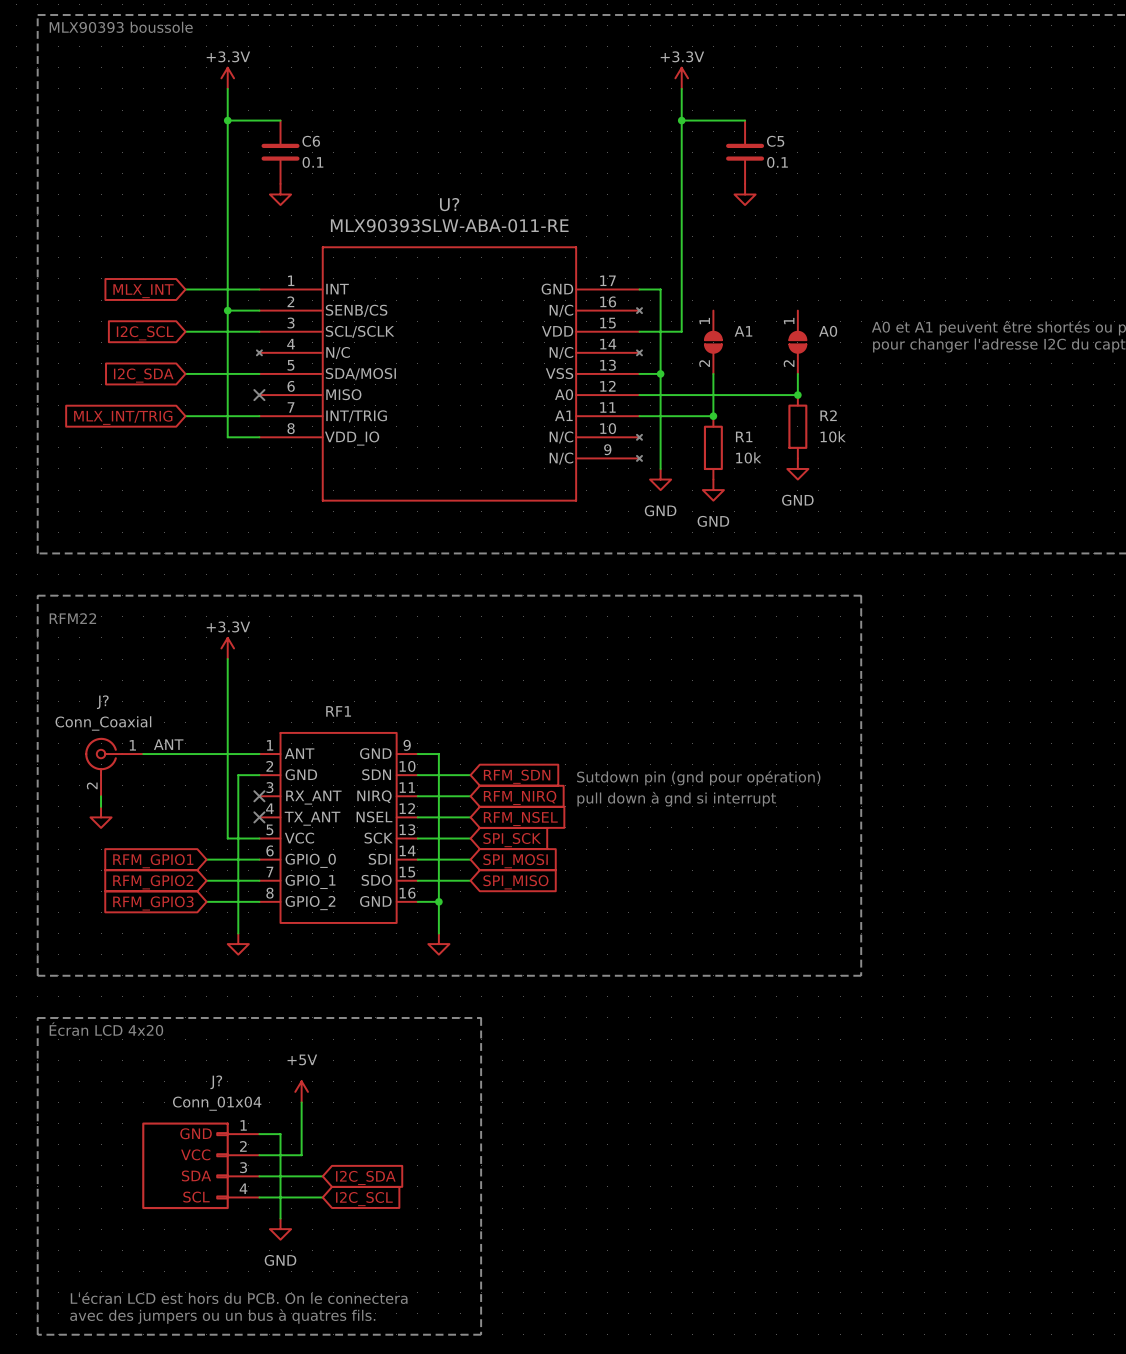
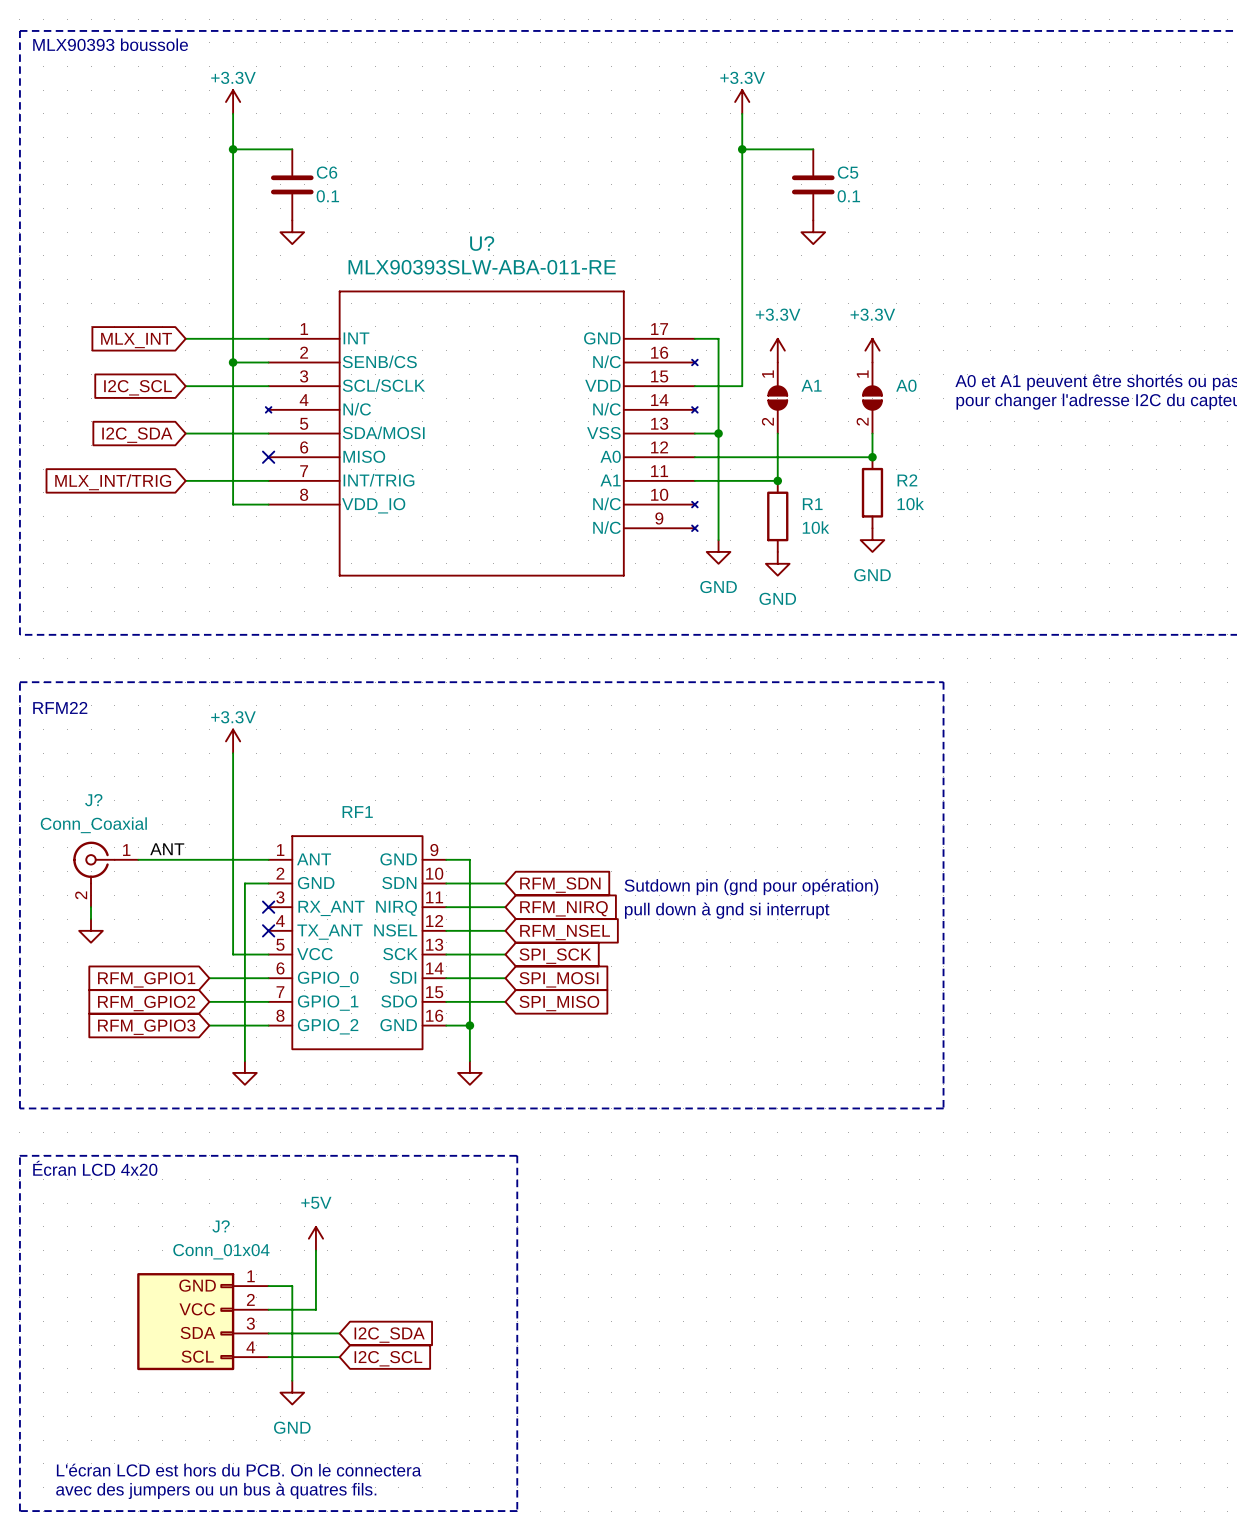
power symbol: none -> +3.3V (777, 350)
power symbol: none -> +3.3V (872, 350)

